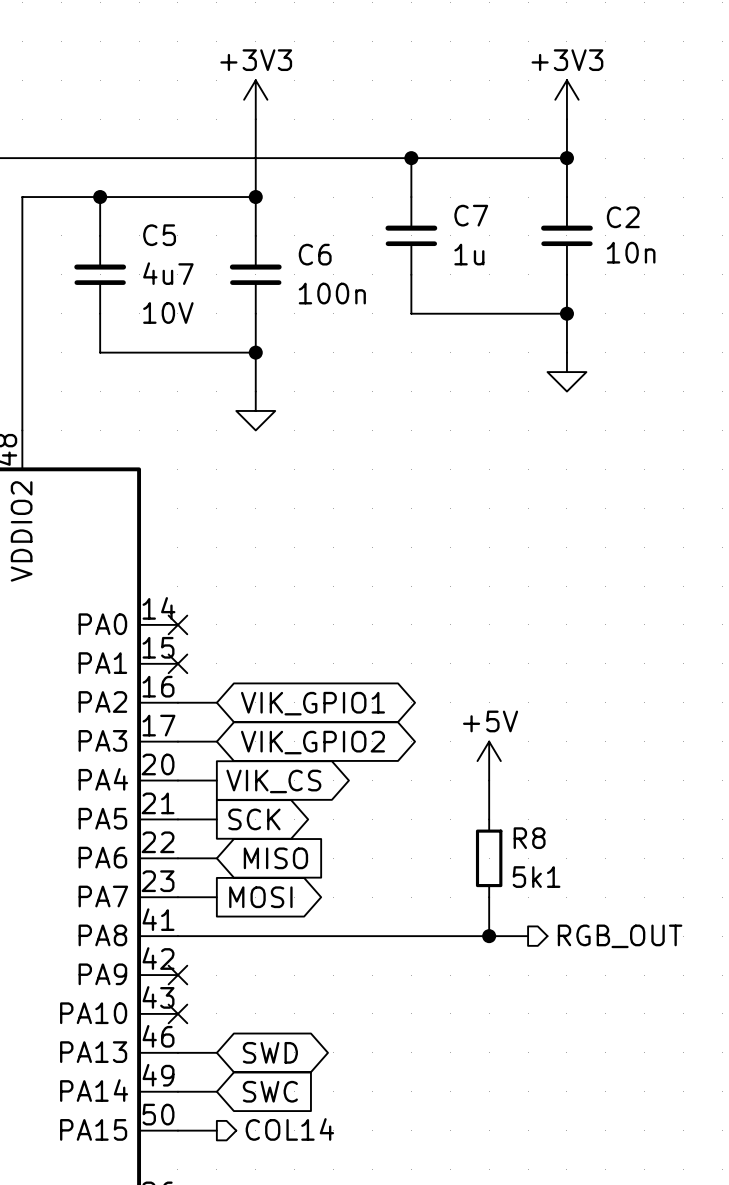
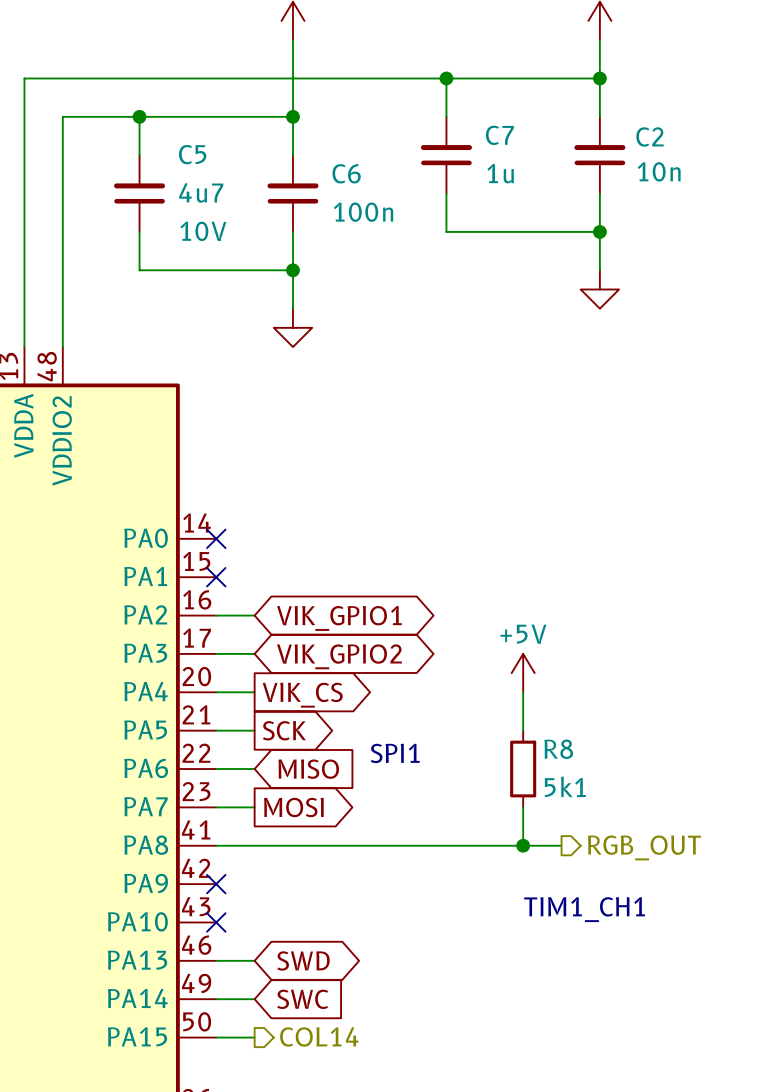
text: none -> SPI1 (395, 753)
text: none -> TIM1_CH1 (584, 909)

